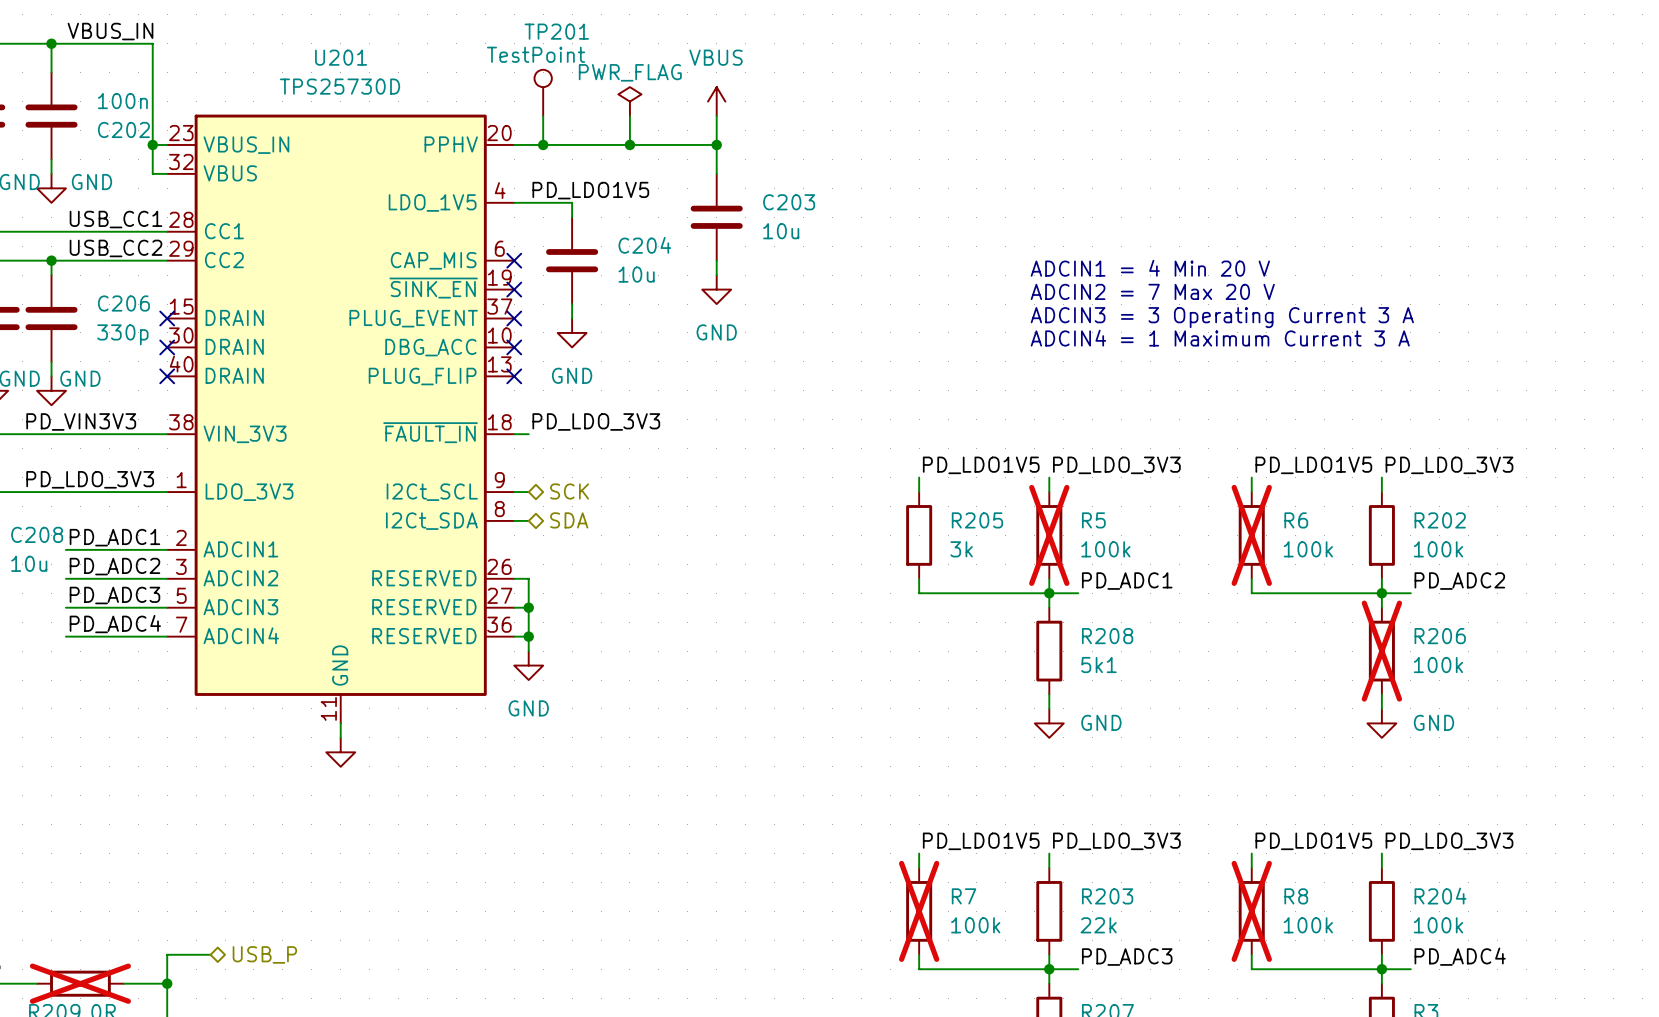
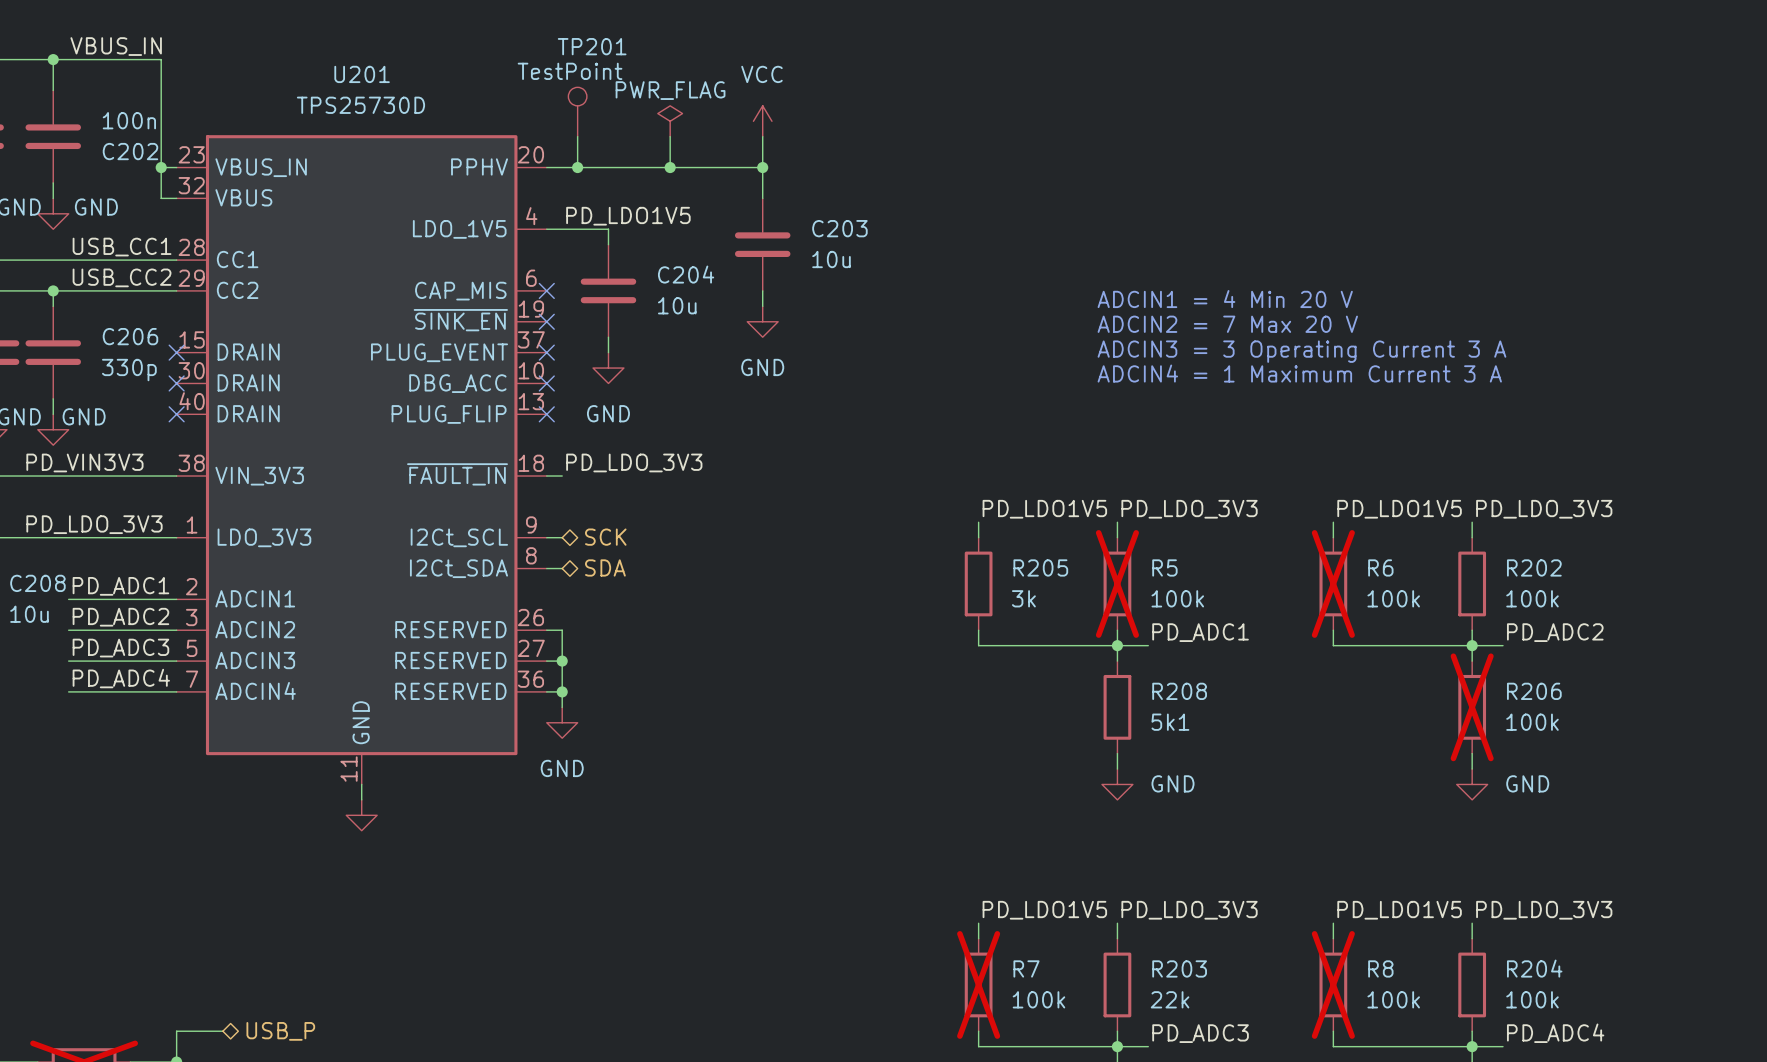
power symbol: VBUS (716, 101) -> VCC (762, 121)

